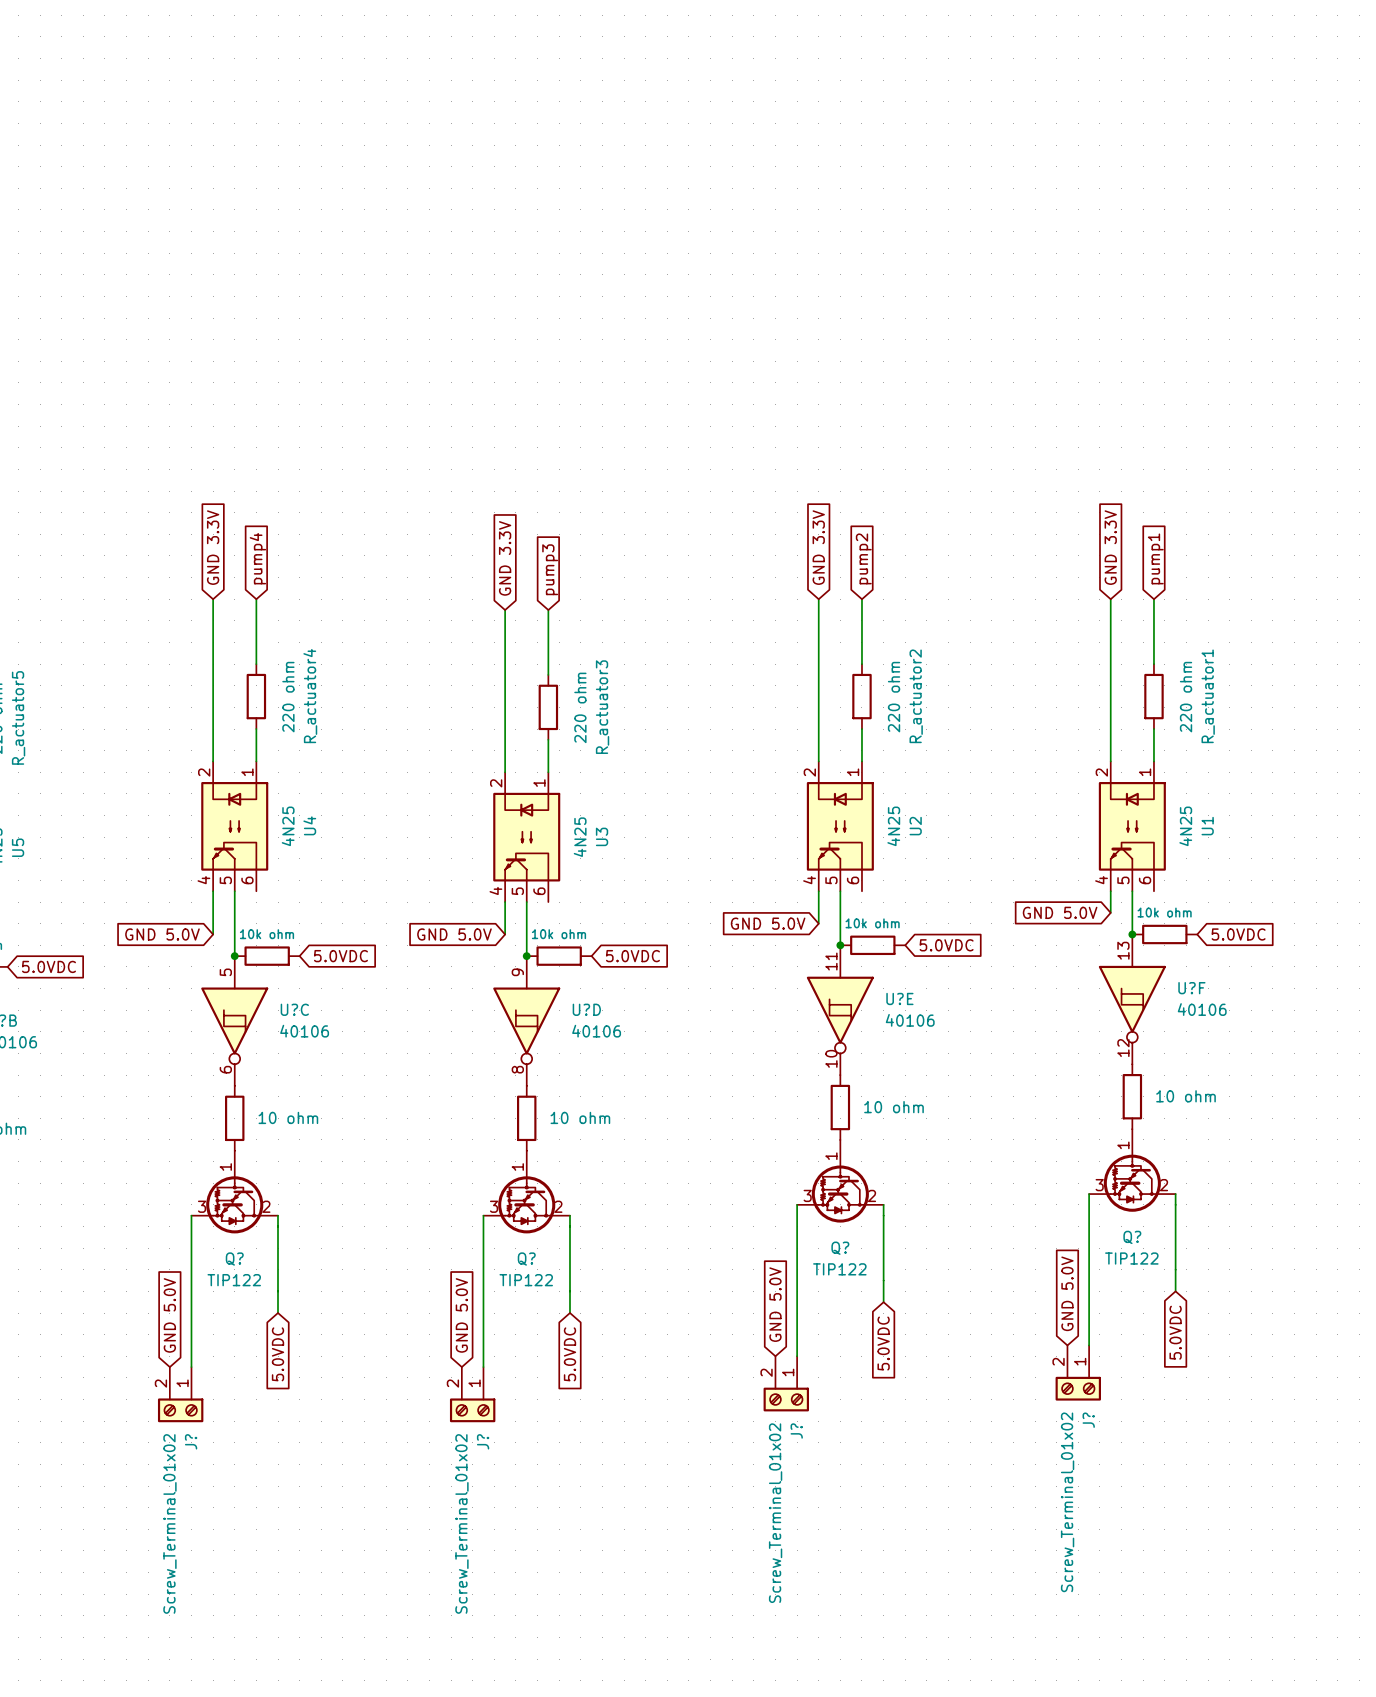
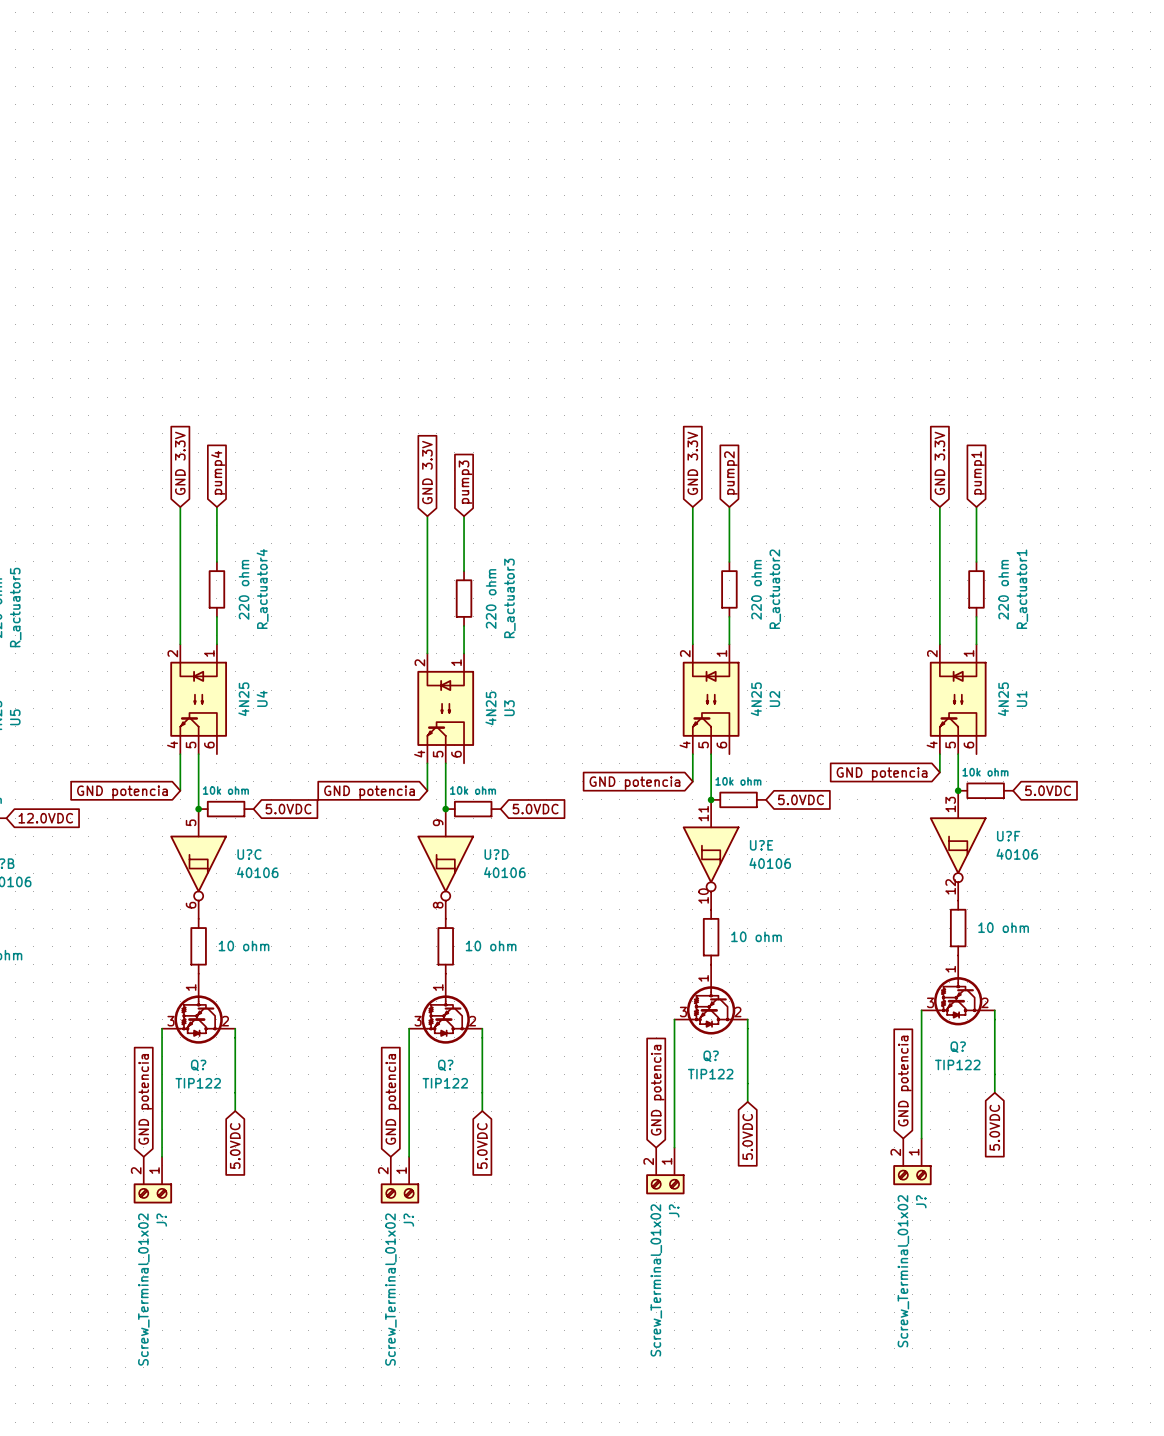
global label: GND 5.0V (1060, 912) -> GND potencia (882, 773)
global label: GND 5.0V (768, 923) -> GND potencia (634, 783)
global label: GND 5.0V (162, 934) -> GND potencia (122, 792)
global label: GND 5.0V (454, 934) -> GND potencia (369, 792)
global label: 5.0VDC (48, 966) -> 12.0VDC (45, 818)
global label: GND 5.0V (1067, 1293) -> GND potencia (904, 1081)
global label: GND 5.0V (775, 1304) -> GND potencia (657, 1090)
global label: GND 5.0V (169, 1315) -> GND potencia (145, 1099)
global label: GND 5.0V (461, 1315) -> GND potencia (392, 1099)

